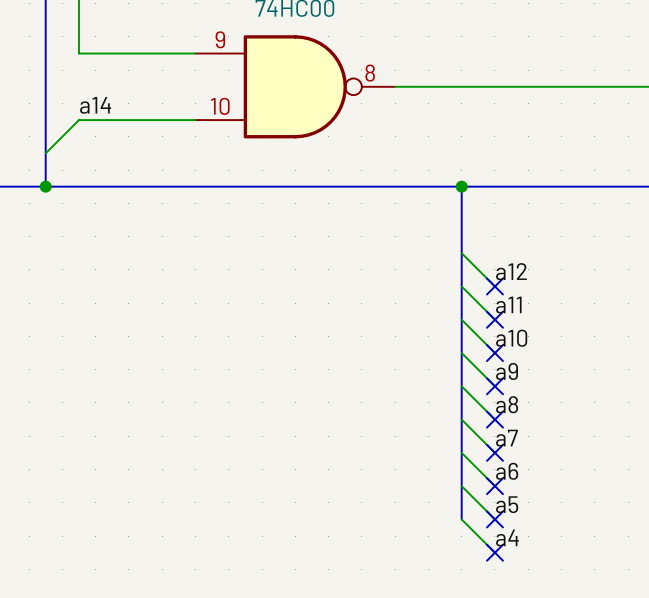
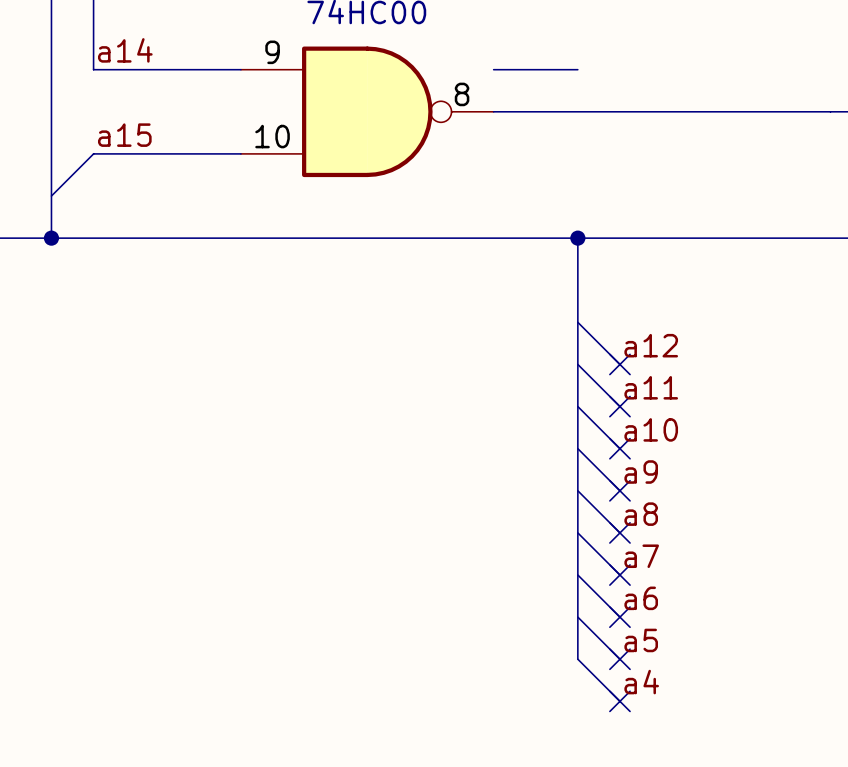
label: none -> a14 (125, 50)
wire: none -> (493, 69) (577, 69)
label: a14 (95, 105) -> a15 (124, 135)

